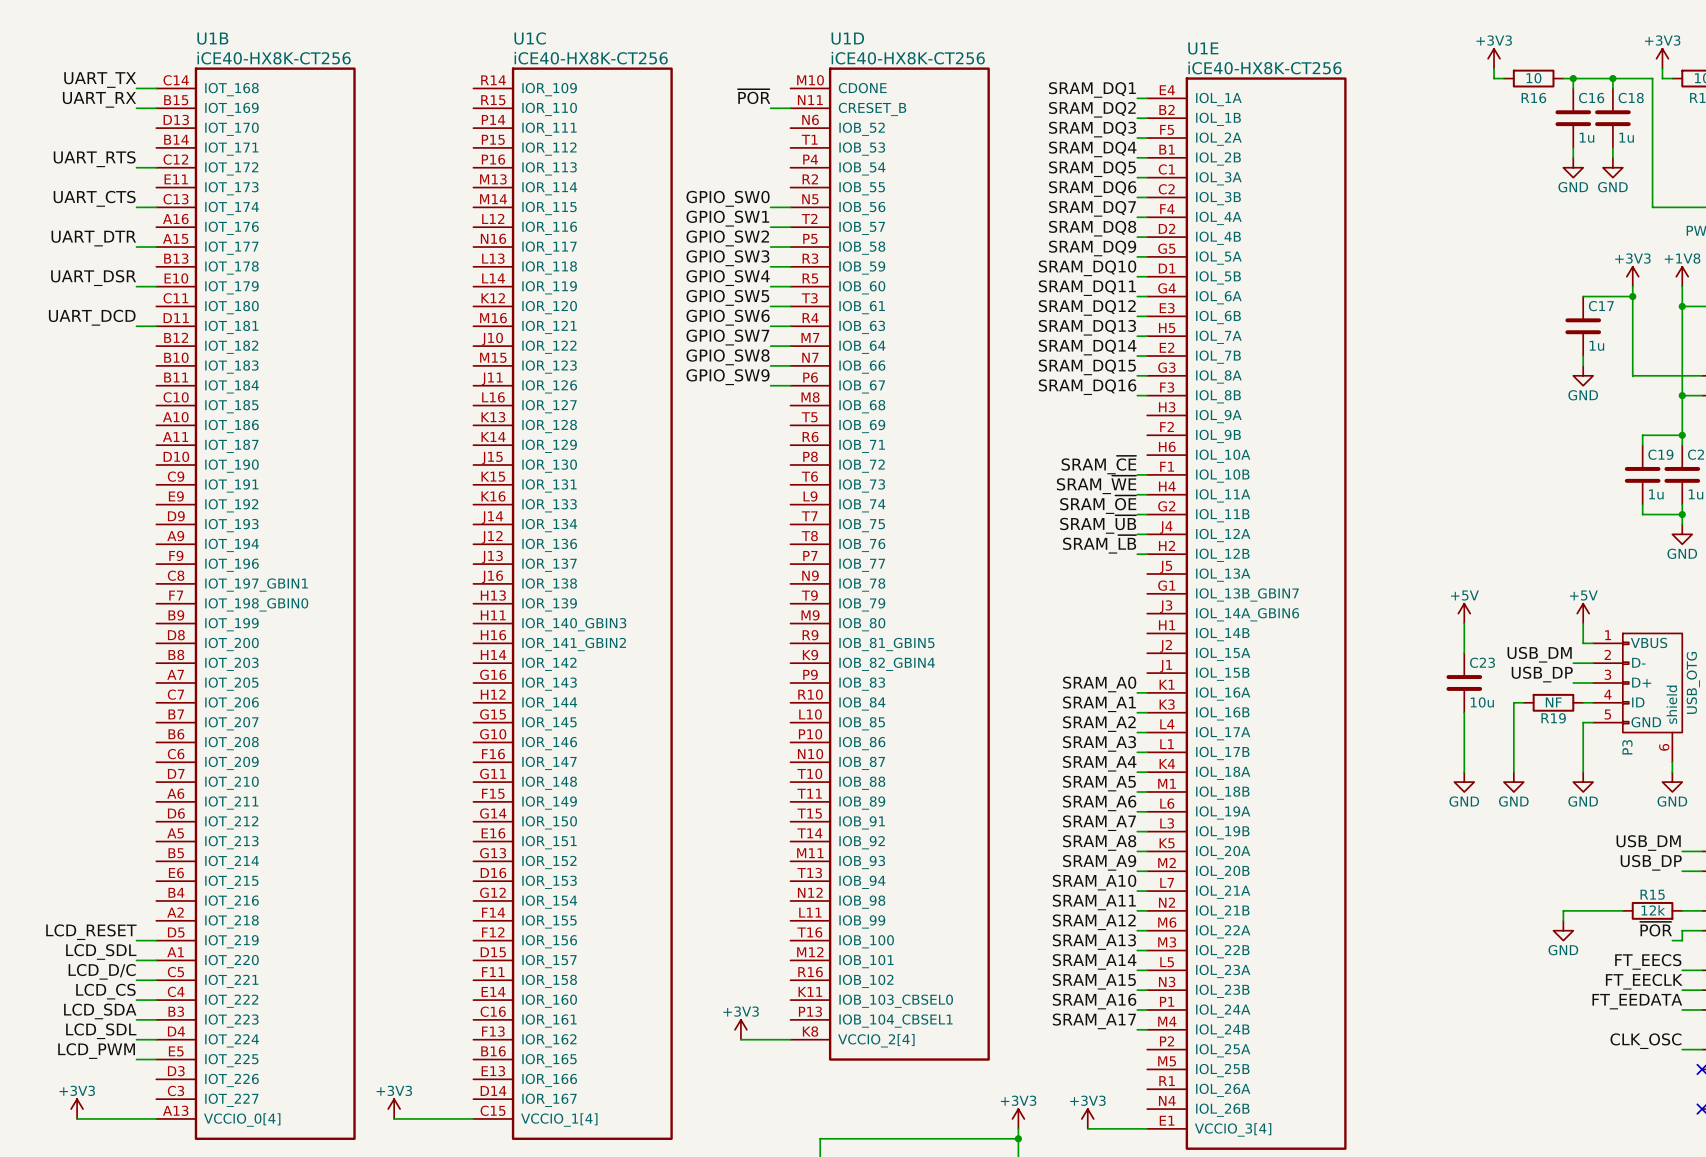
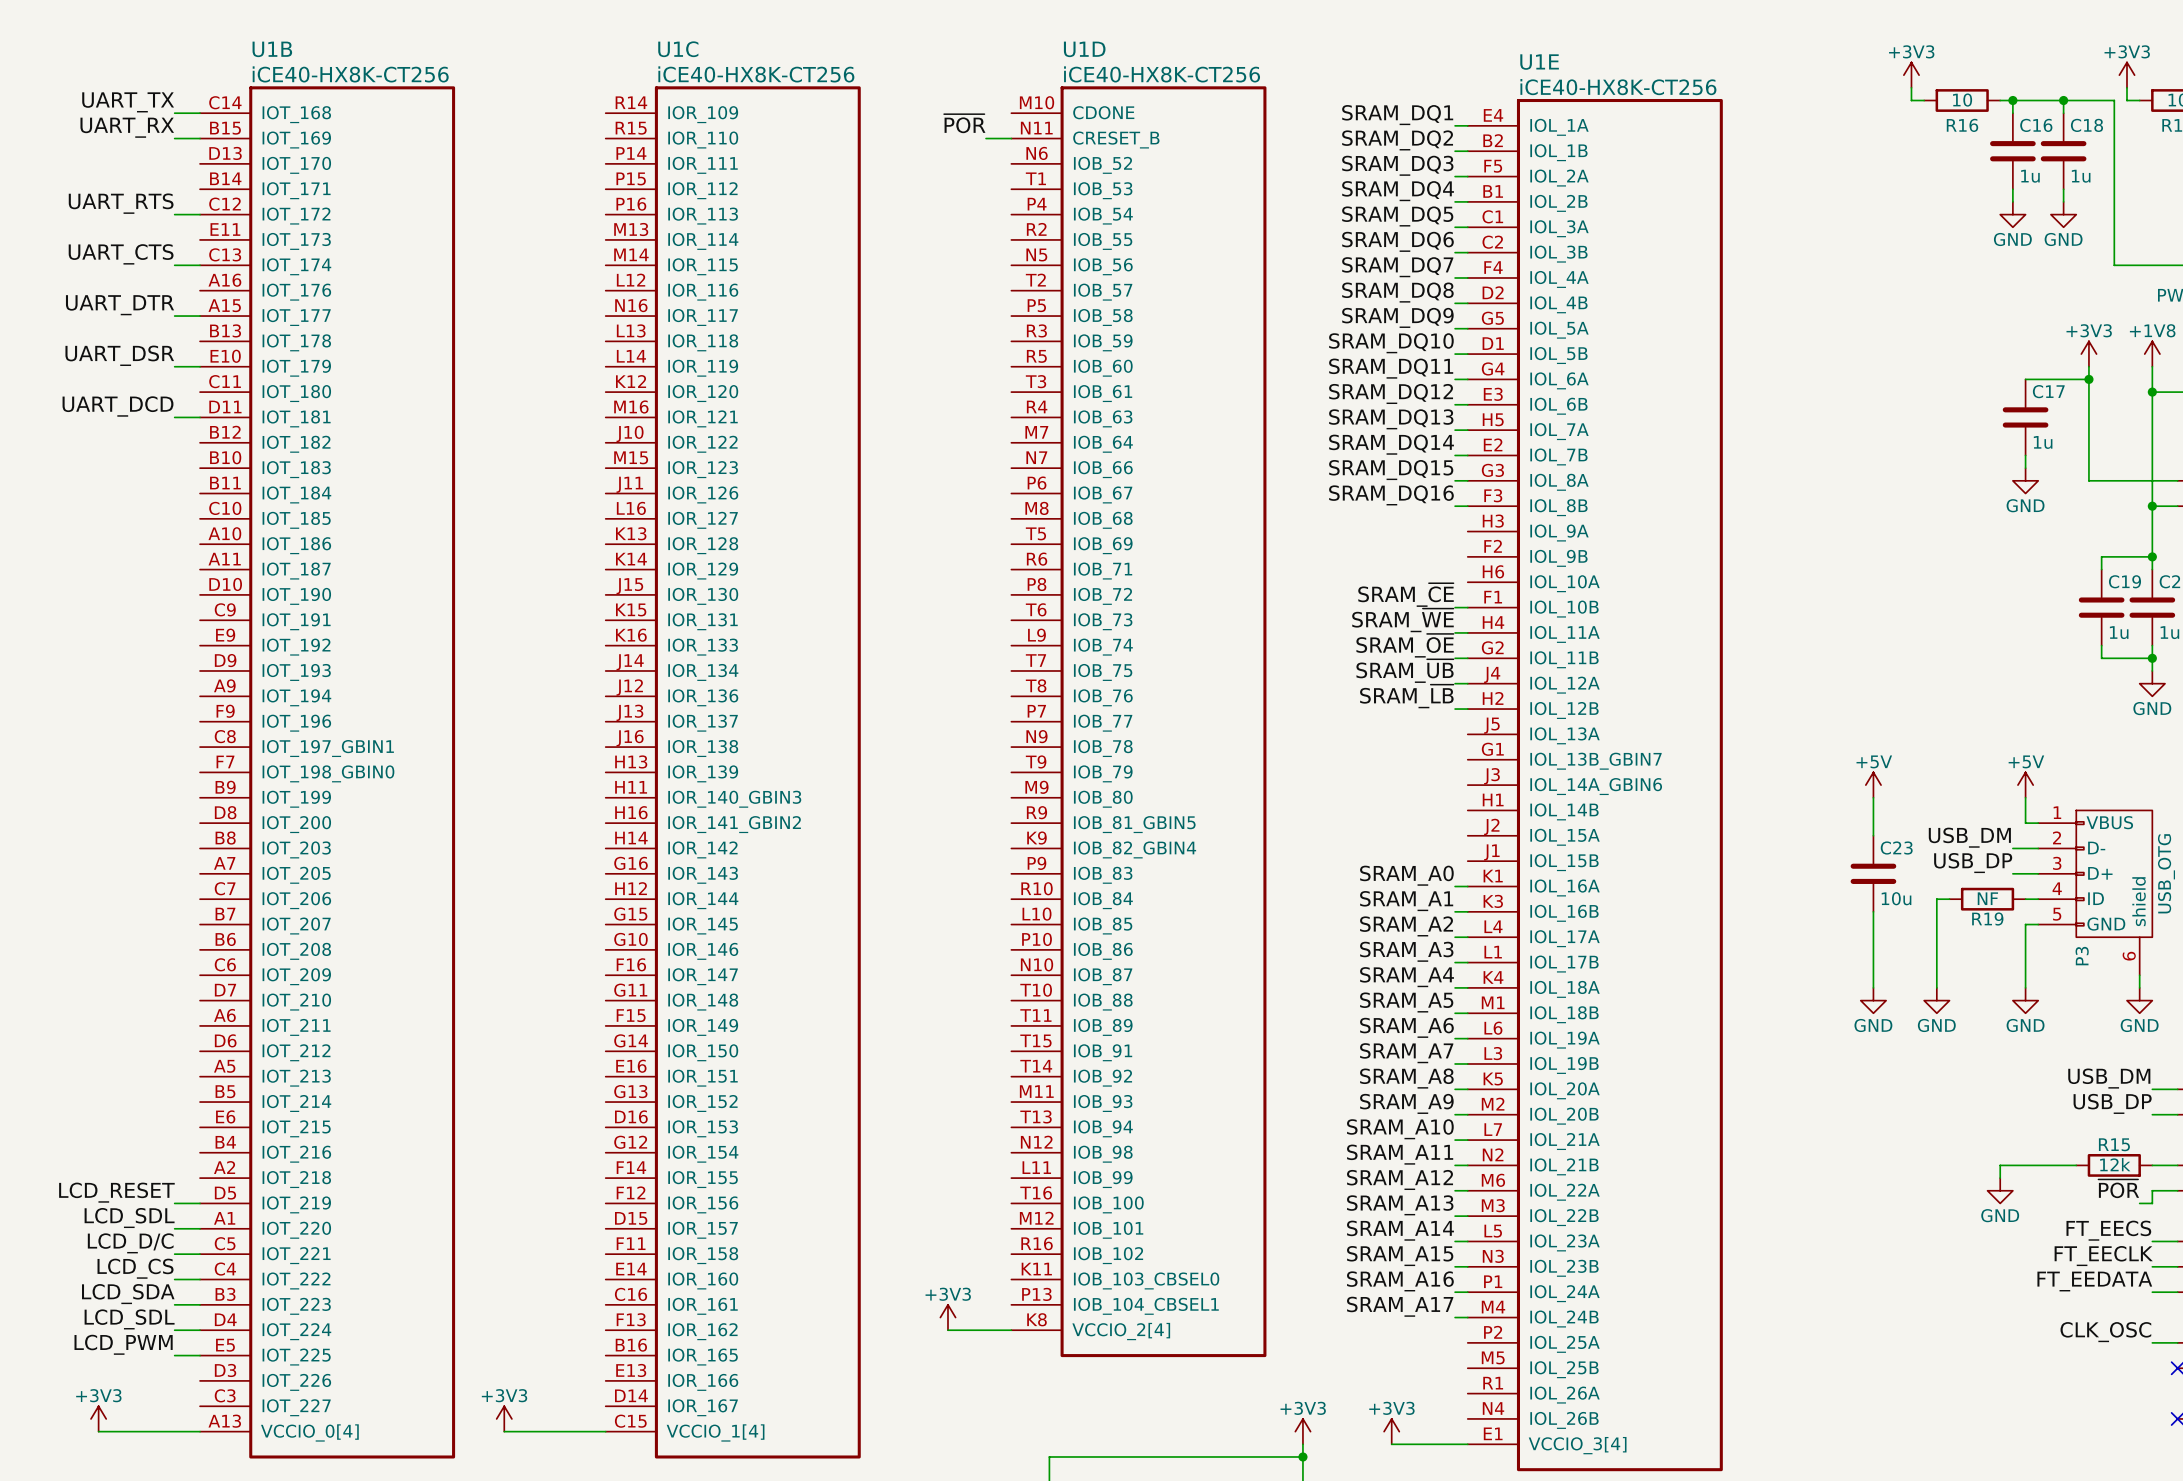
label: GPIO_SW0 (728, 198) -> none
wire: (770, 207) (790, 207) -> none
label: GPIO_SW1 (727, 218) -> none
wire: (770, 227) (790, 227) -> none
label: GPIO_SW2 (727, 238) -> none
wire: (770, 247) (790, 247) -> none
label: GPIO_SW3 (727, 258) -> none
wire: (770, 266) (790, 266) -> none
label: GPIO_SW4 (728, 278) -> none
wire: (770, 286) (790, 286) -> none
label: GPIO_SW5 (727, 297) -> none
wire: (770, 306) (790, 306) -> none
label: GPIO_SW6 (728, 317) -> none
wire: (770, 326) (790, 326) -> none
label: GPIO_SW7 (727, 337) -> none
wire: (770, 346) (790, 346) -> none
label: GPIO_SW8 (728, 357) -> none
wire: (770, 365) (790, 365) -> none
label: GPIO_SW9 (728, 377) -> none
wire: (770, 385) (790, 385) -> none

